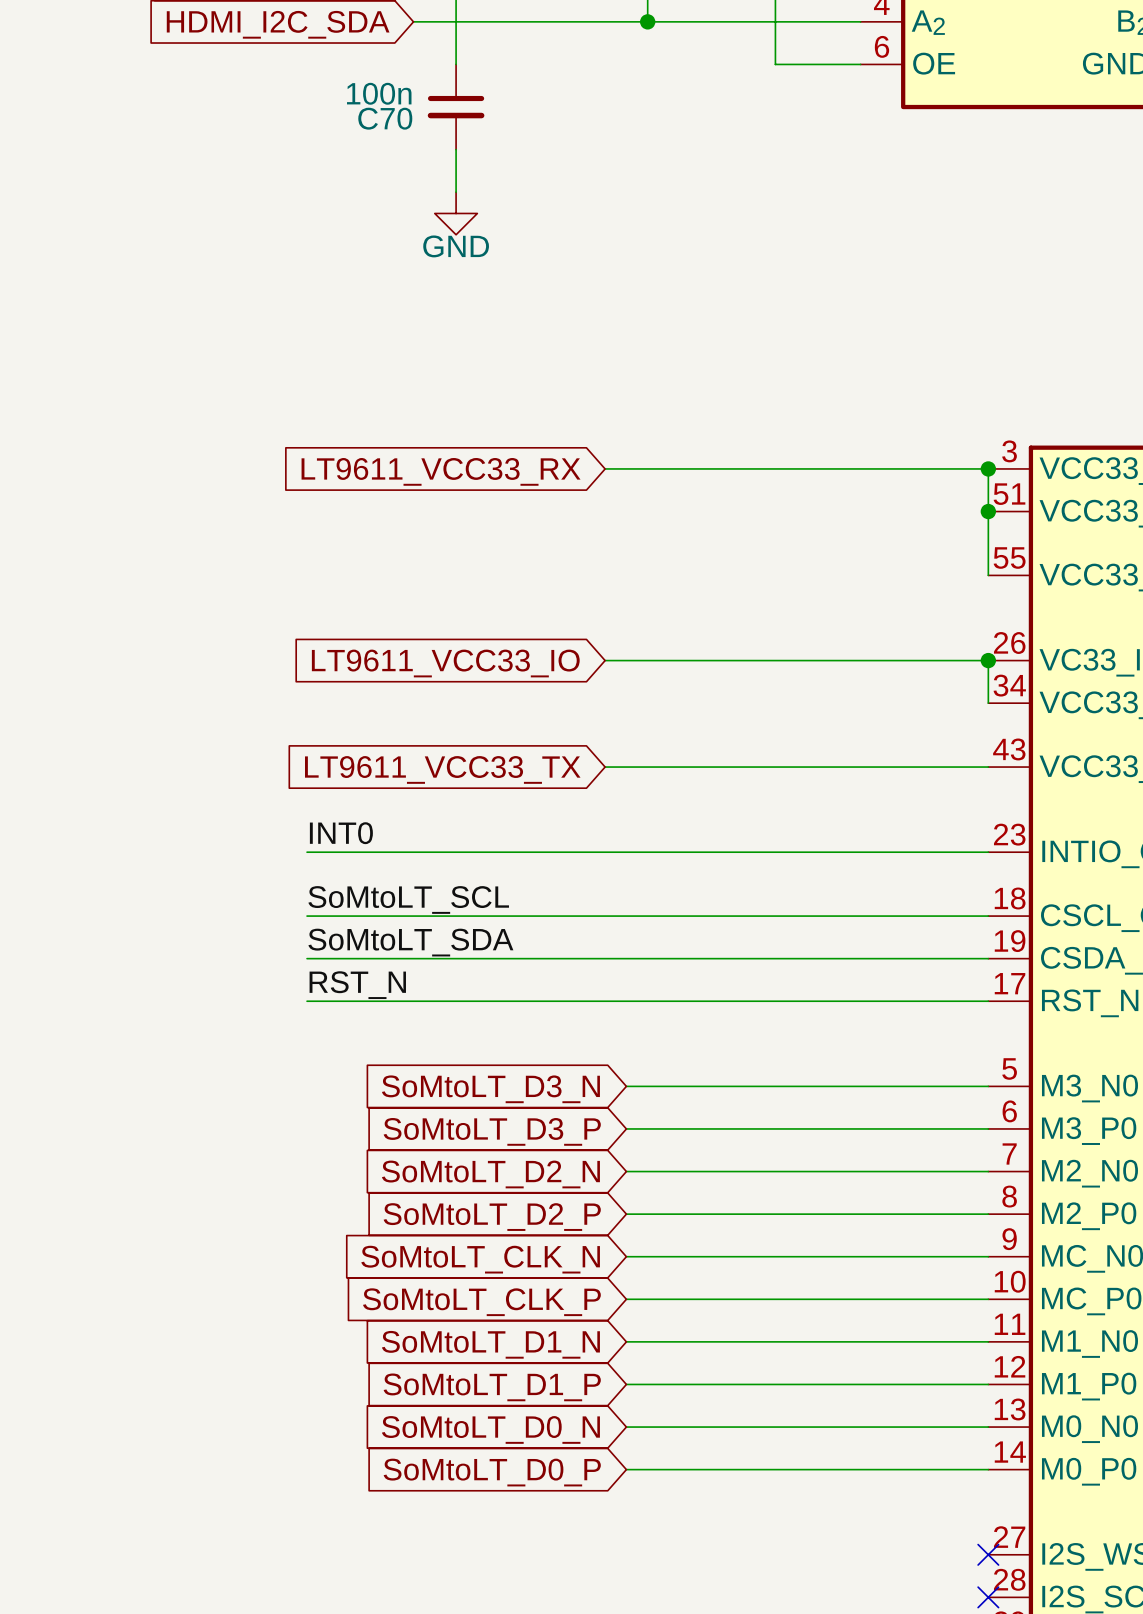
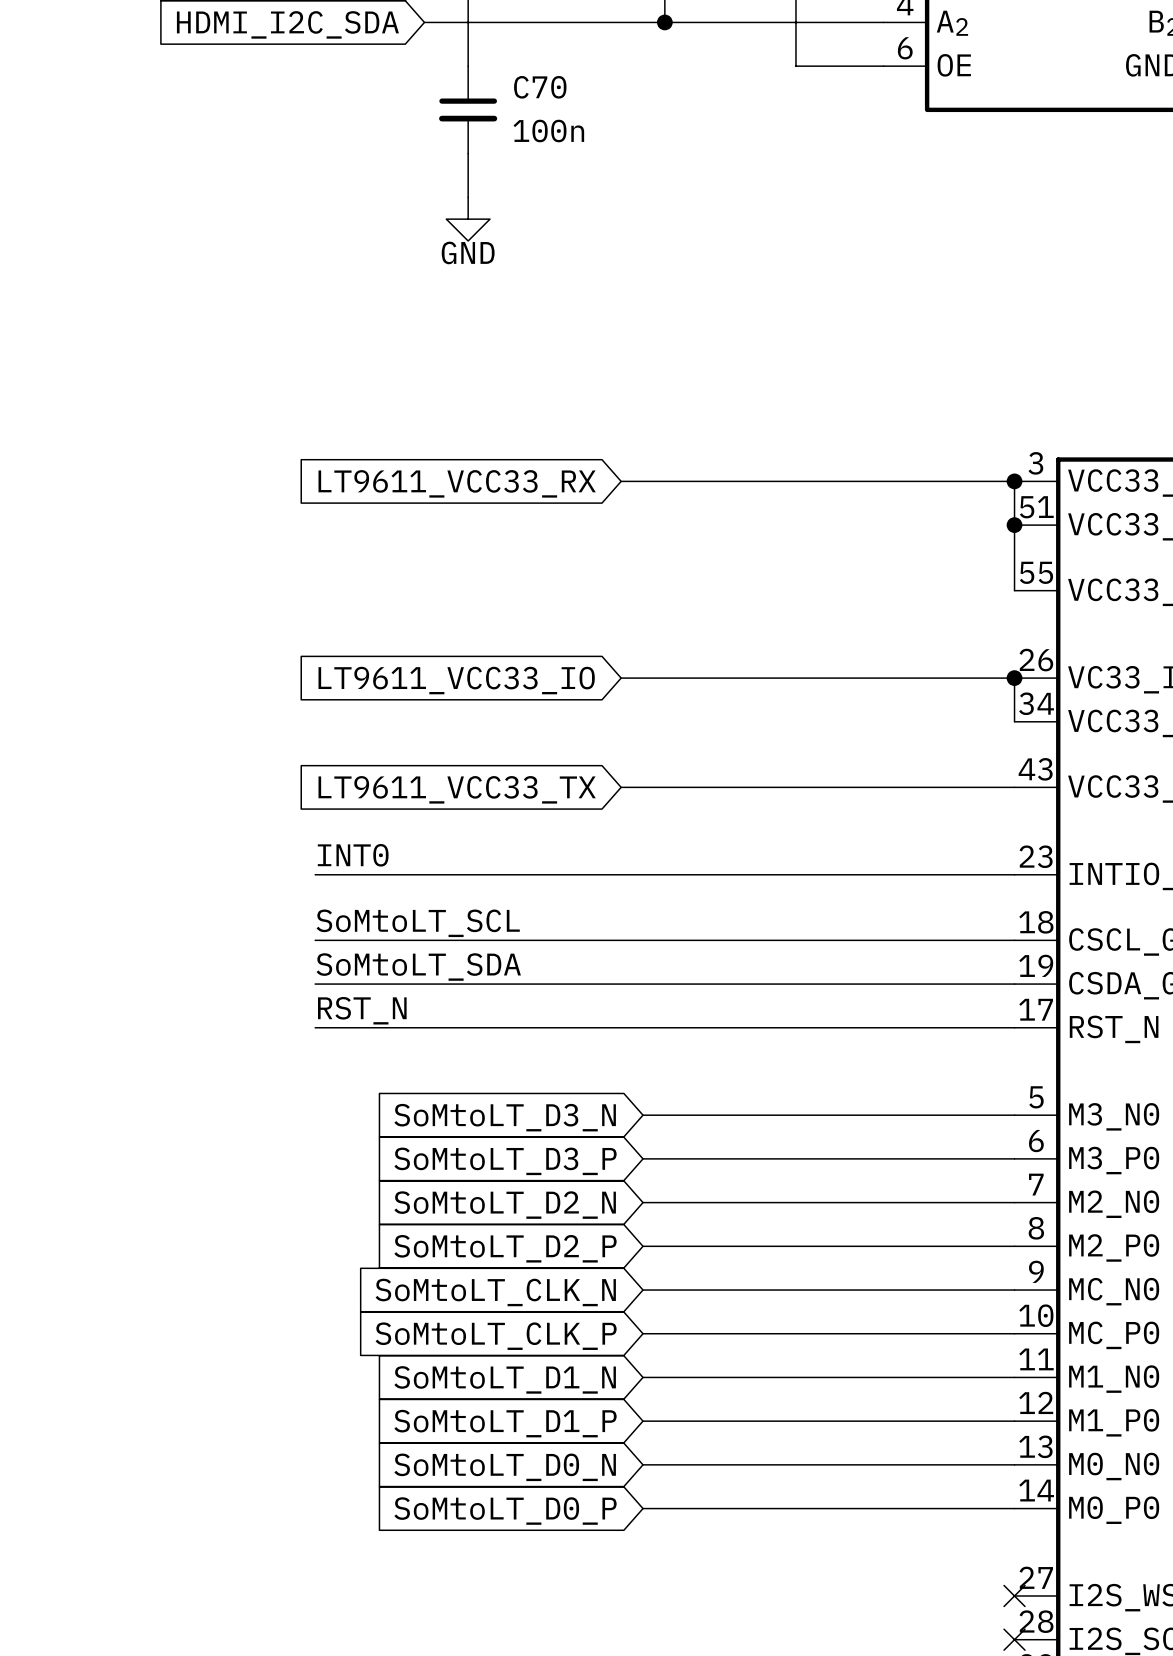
C70 text position: 100n (379, 93) -> 100n (548, 131)
C70 name position: C70 (385, 118) -> C70 (540, 87)

